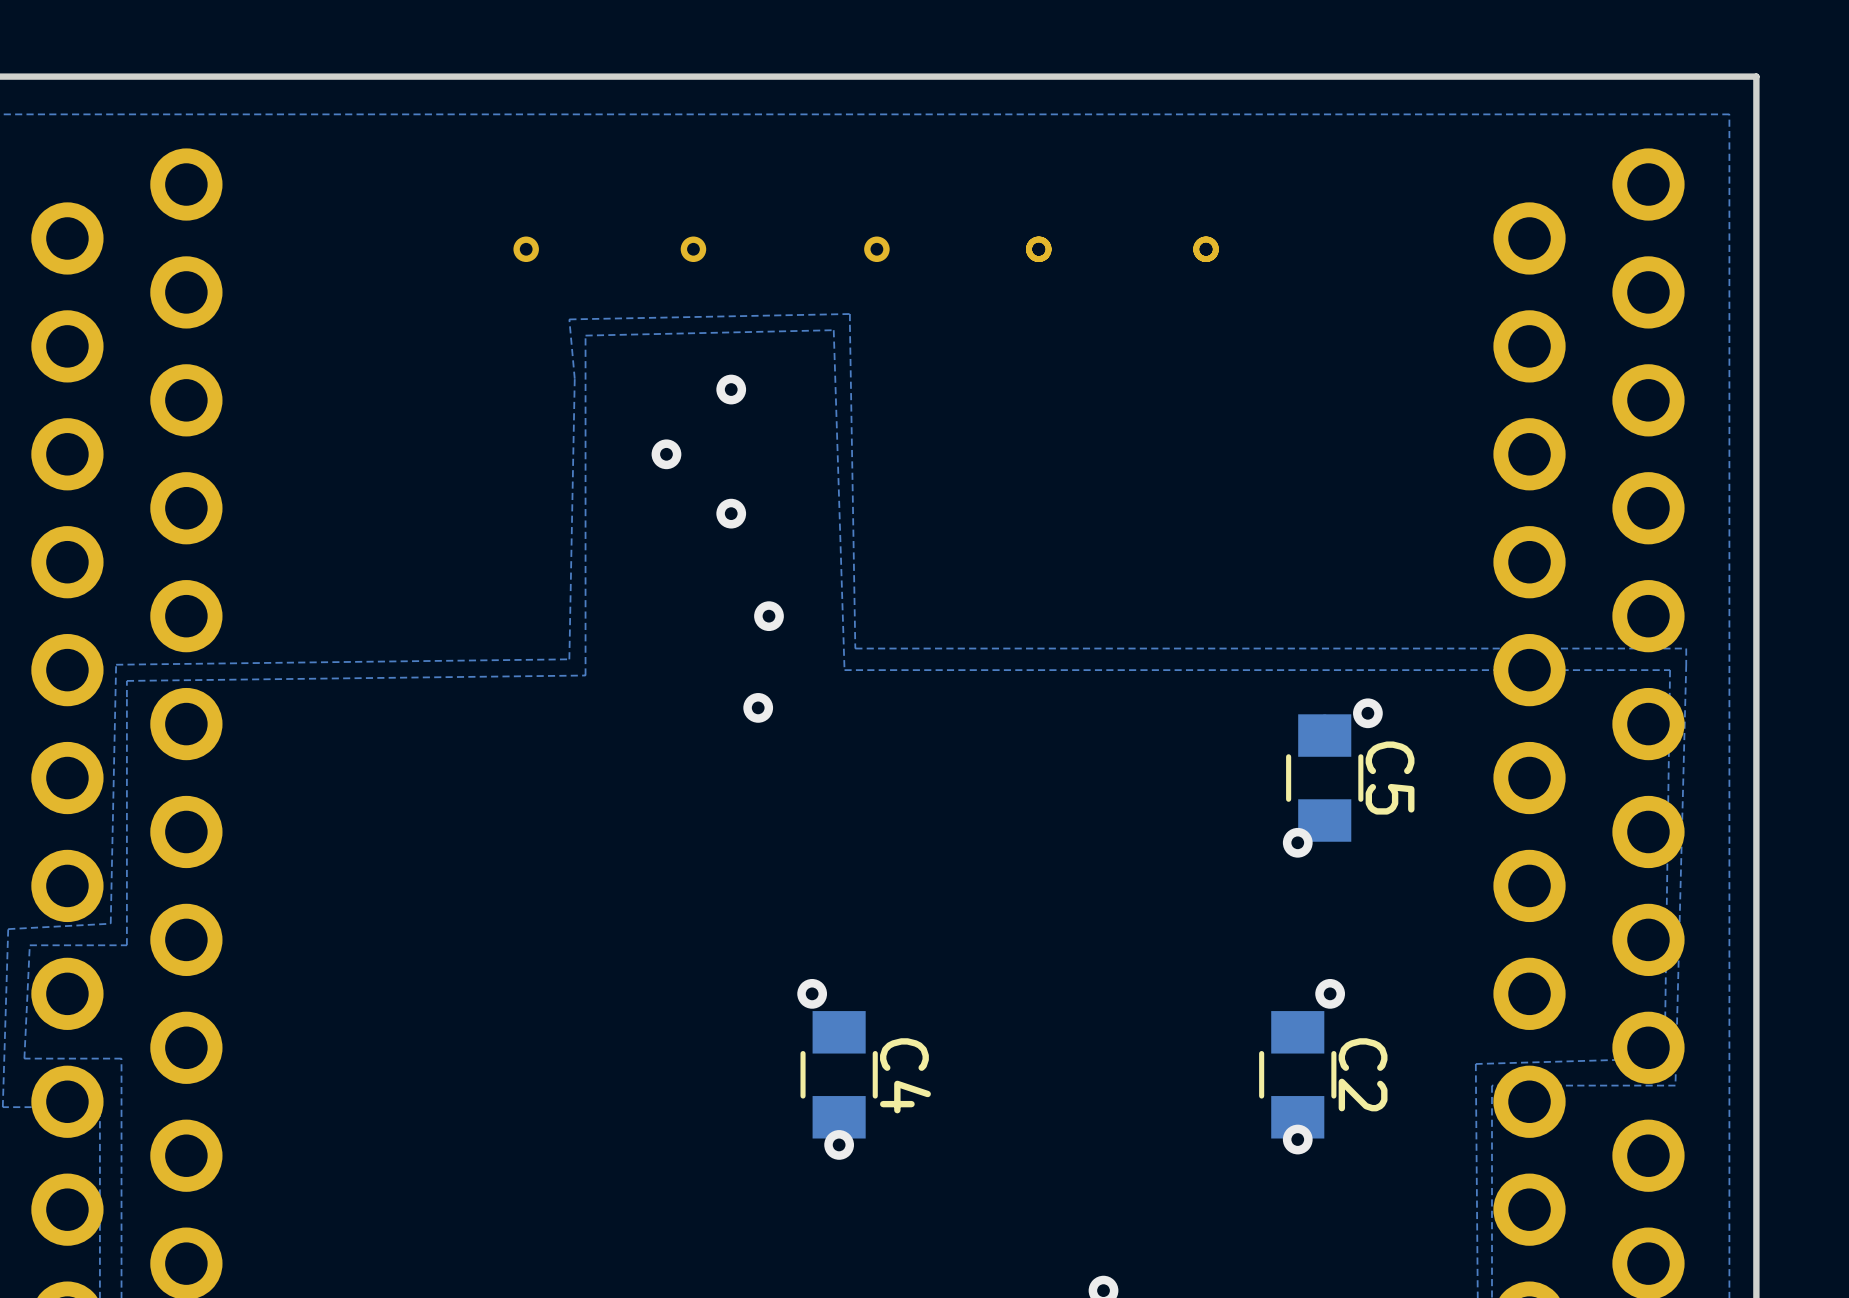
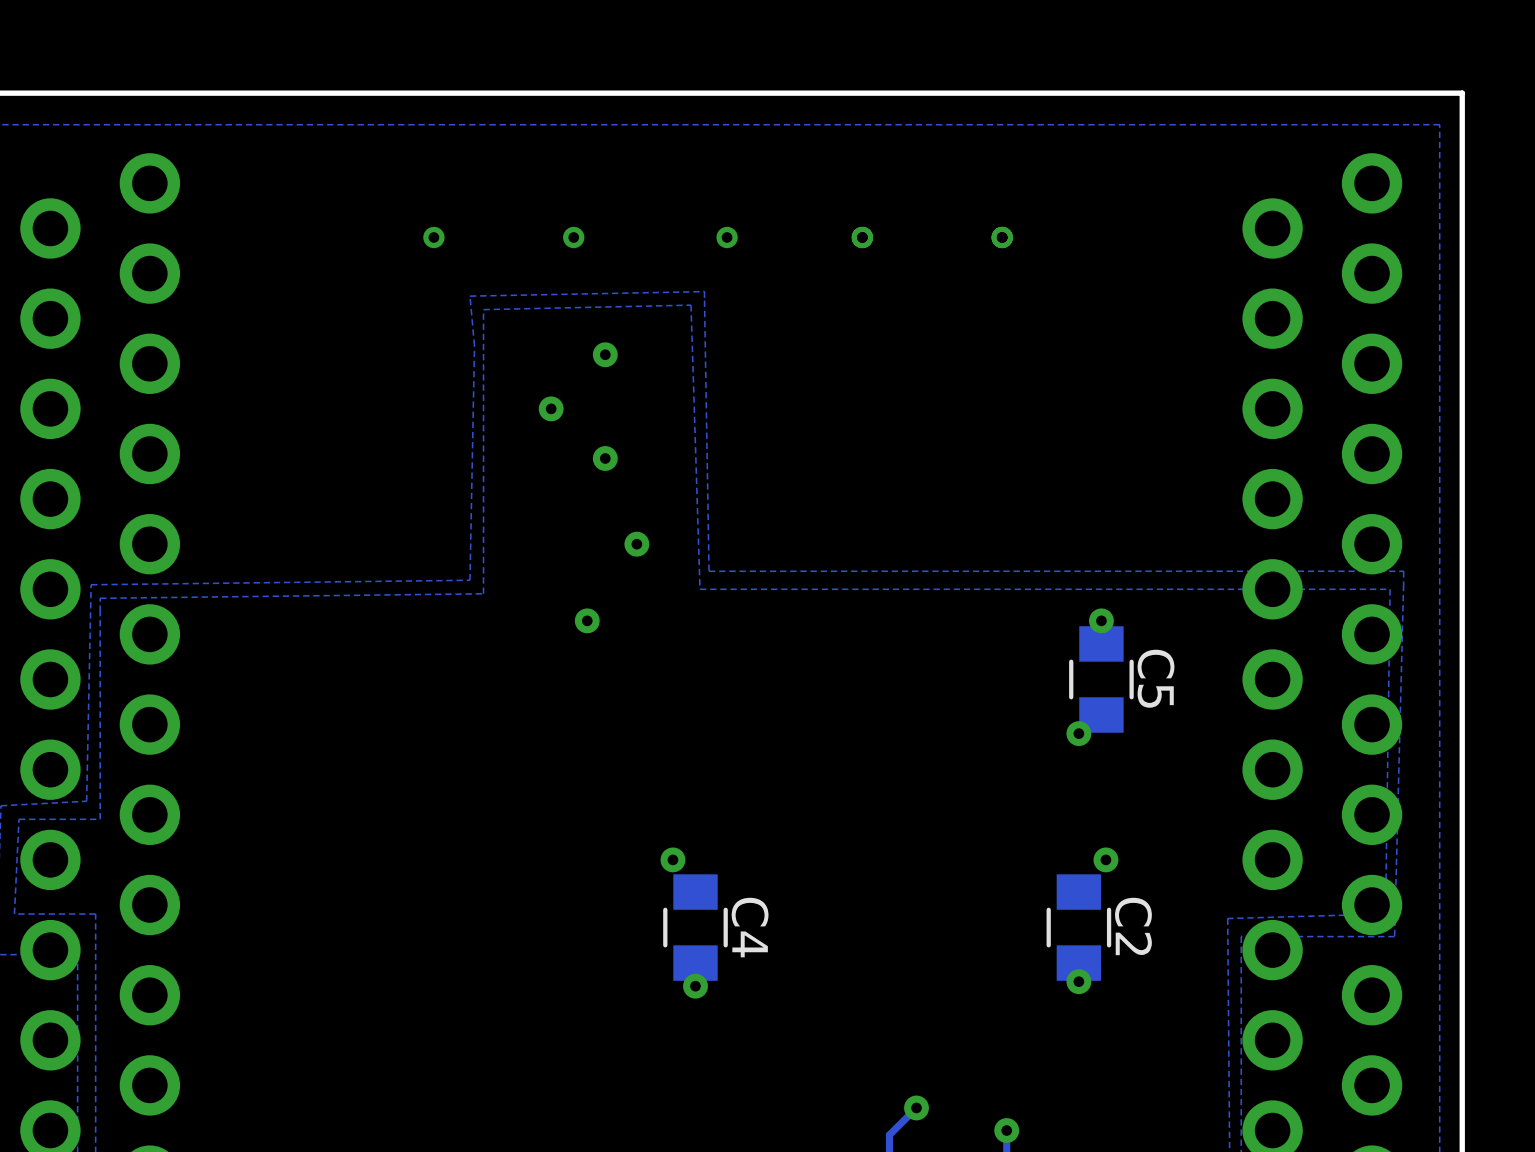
via position: (758, 707) -> (587, 620)
via position: (1367, 713) -> (1101, 620)

